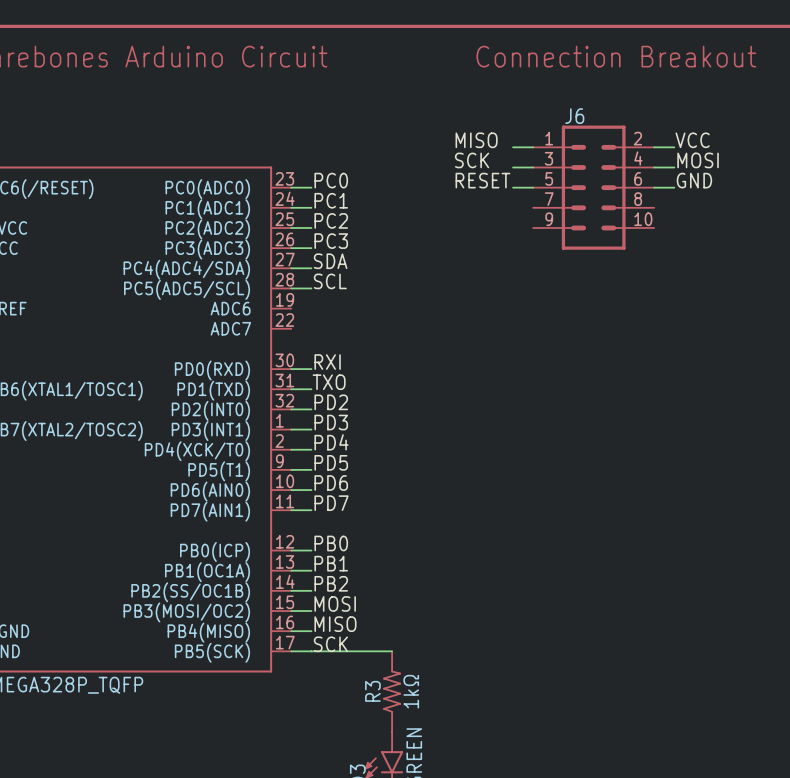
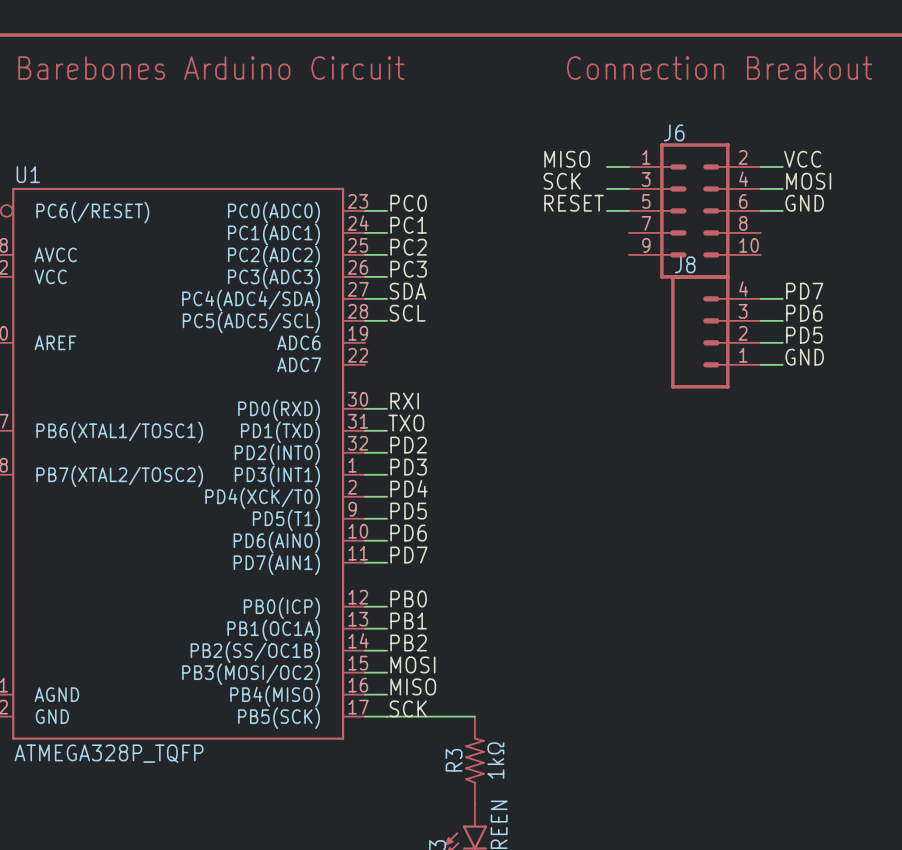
label: none -> PD7 (804, 291)
wire: none -> (760, 298) (782, 298)
label: none -> PD6 (804, 313)
wire: none -> (760, 320) (782, 320)
J8: none -> (715, 331)
label: none -> PD5 (804, 335)
wire: none -> (760, 342) (782, 342)
label: none -> GND (804, 357)
wire: none -> (760, 364) (782, 364)

